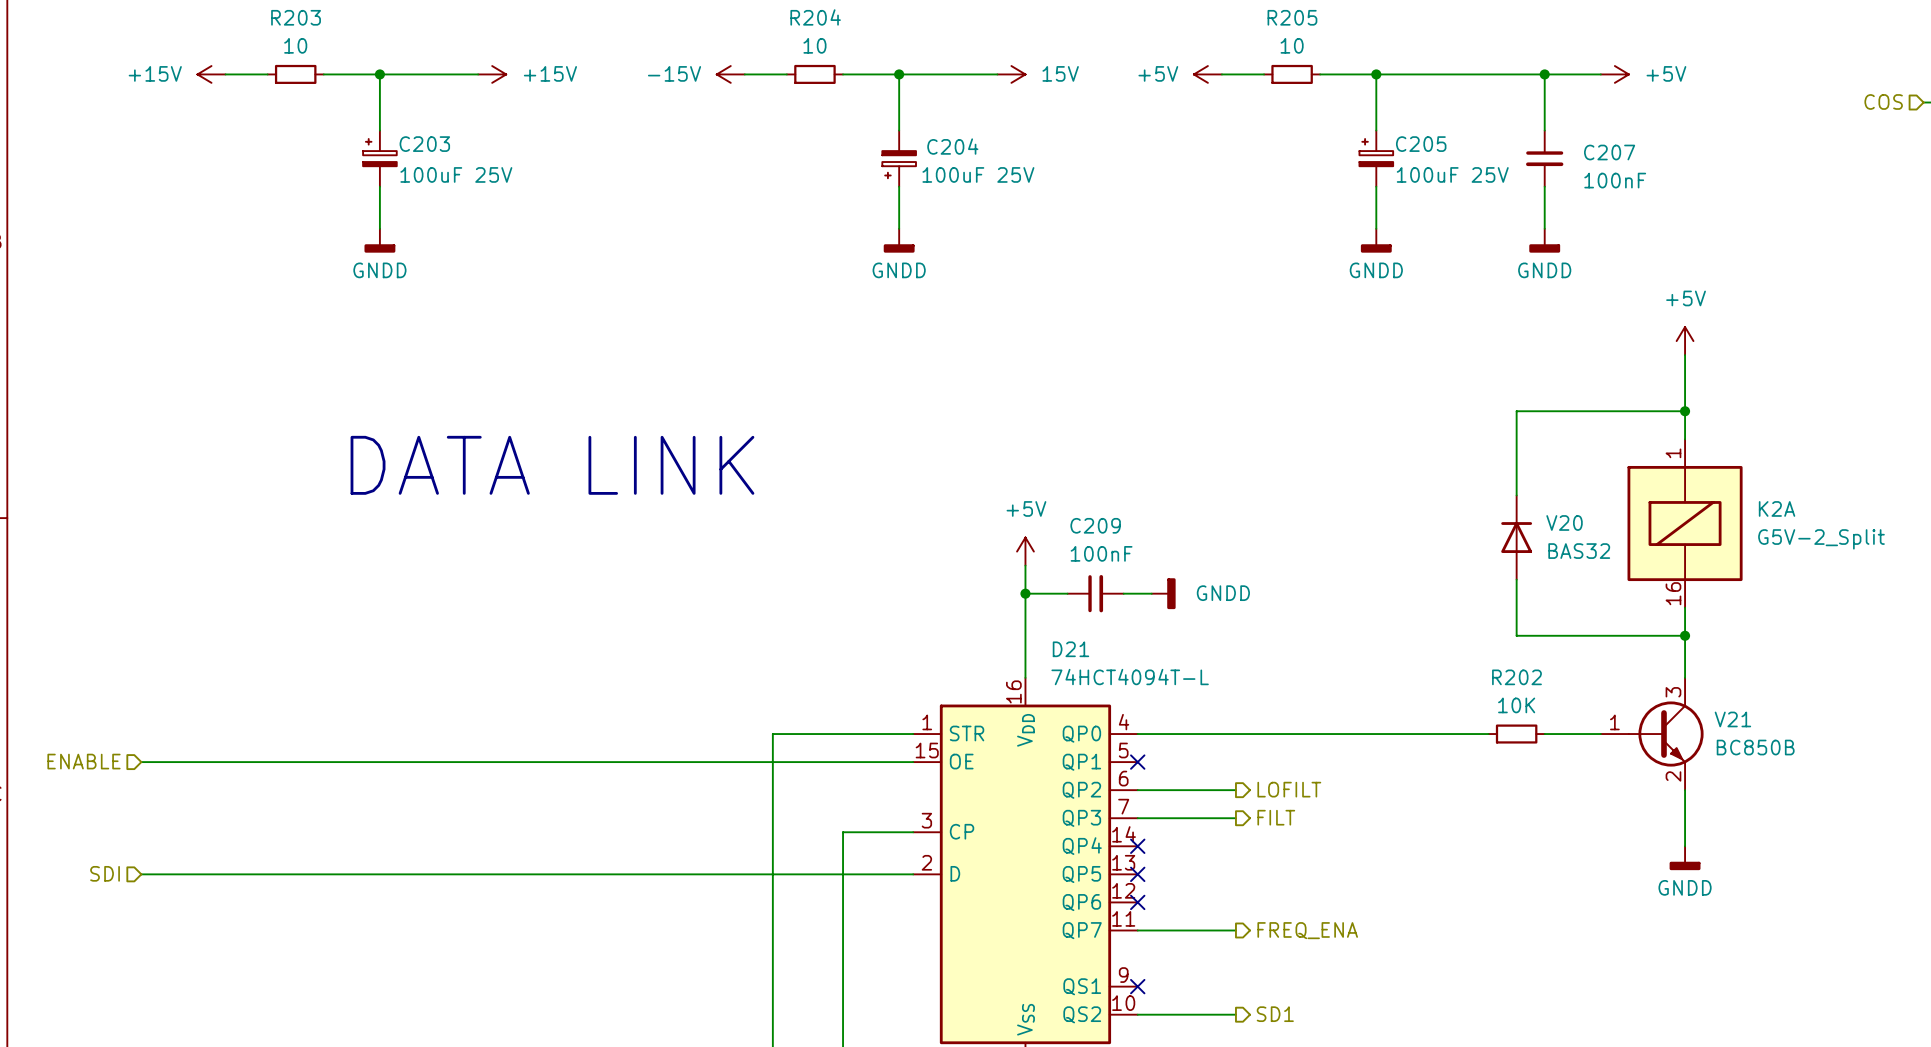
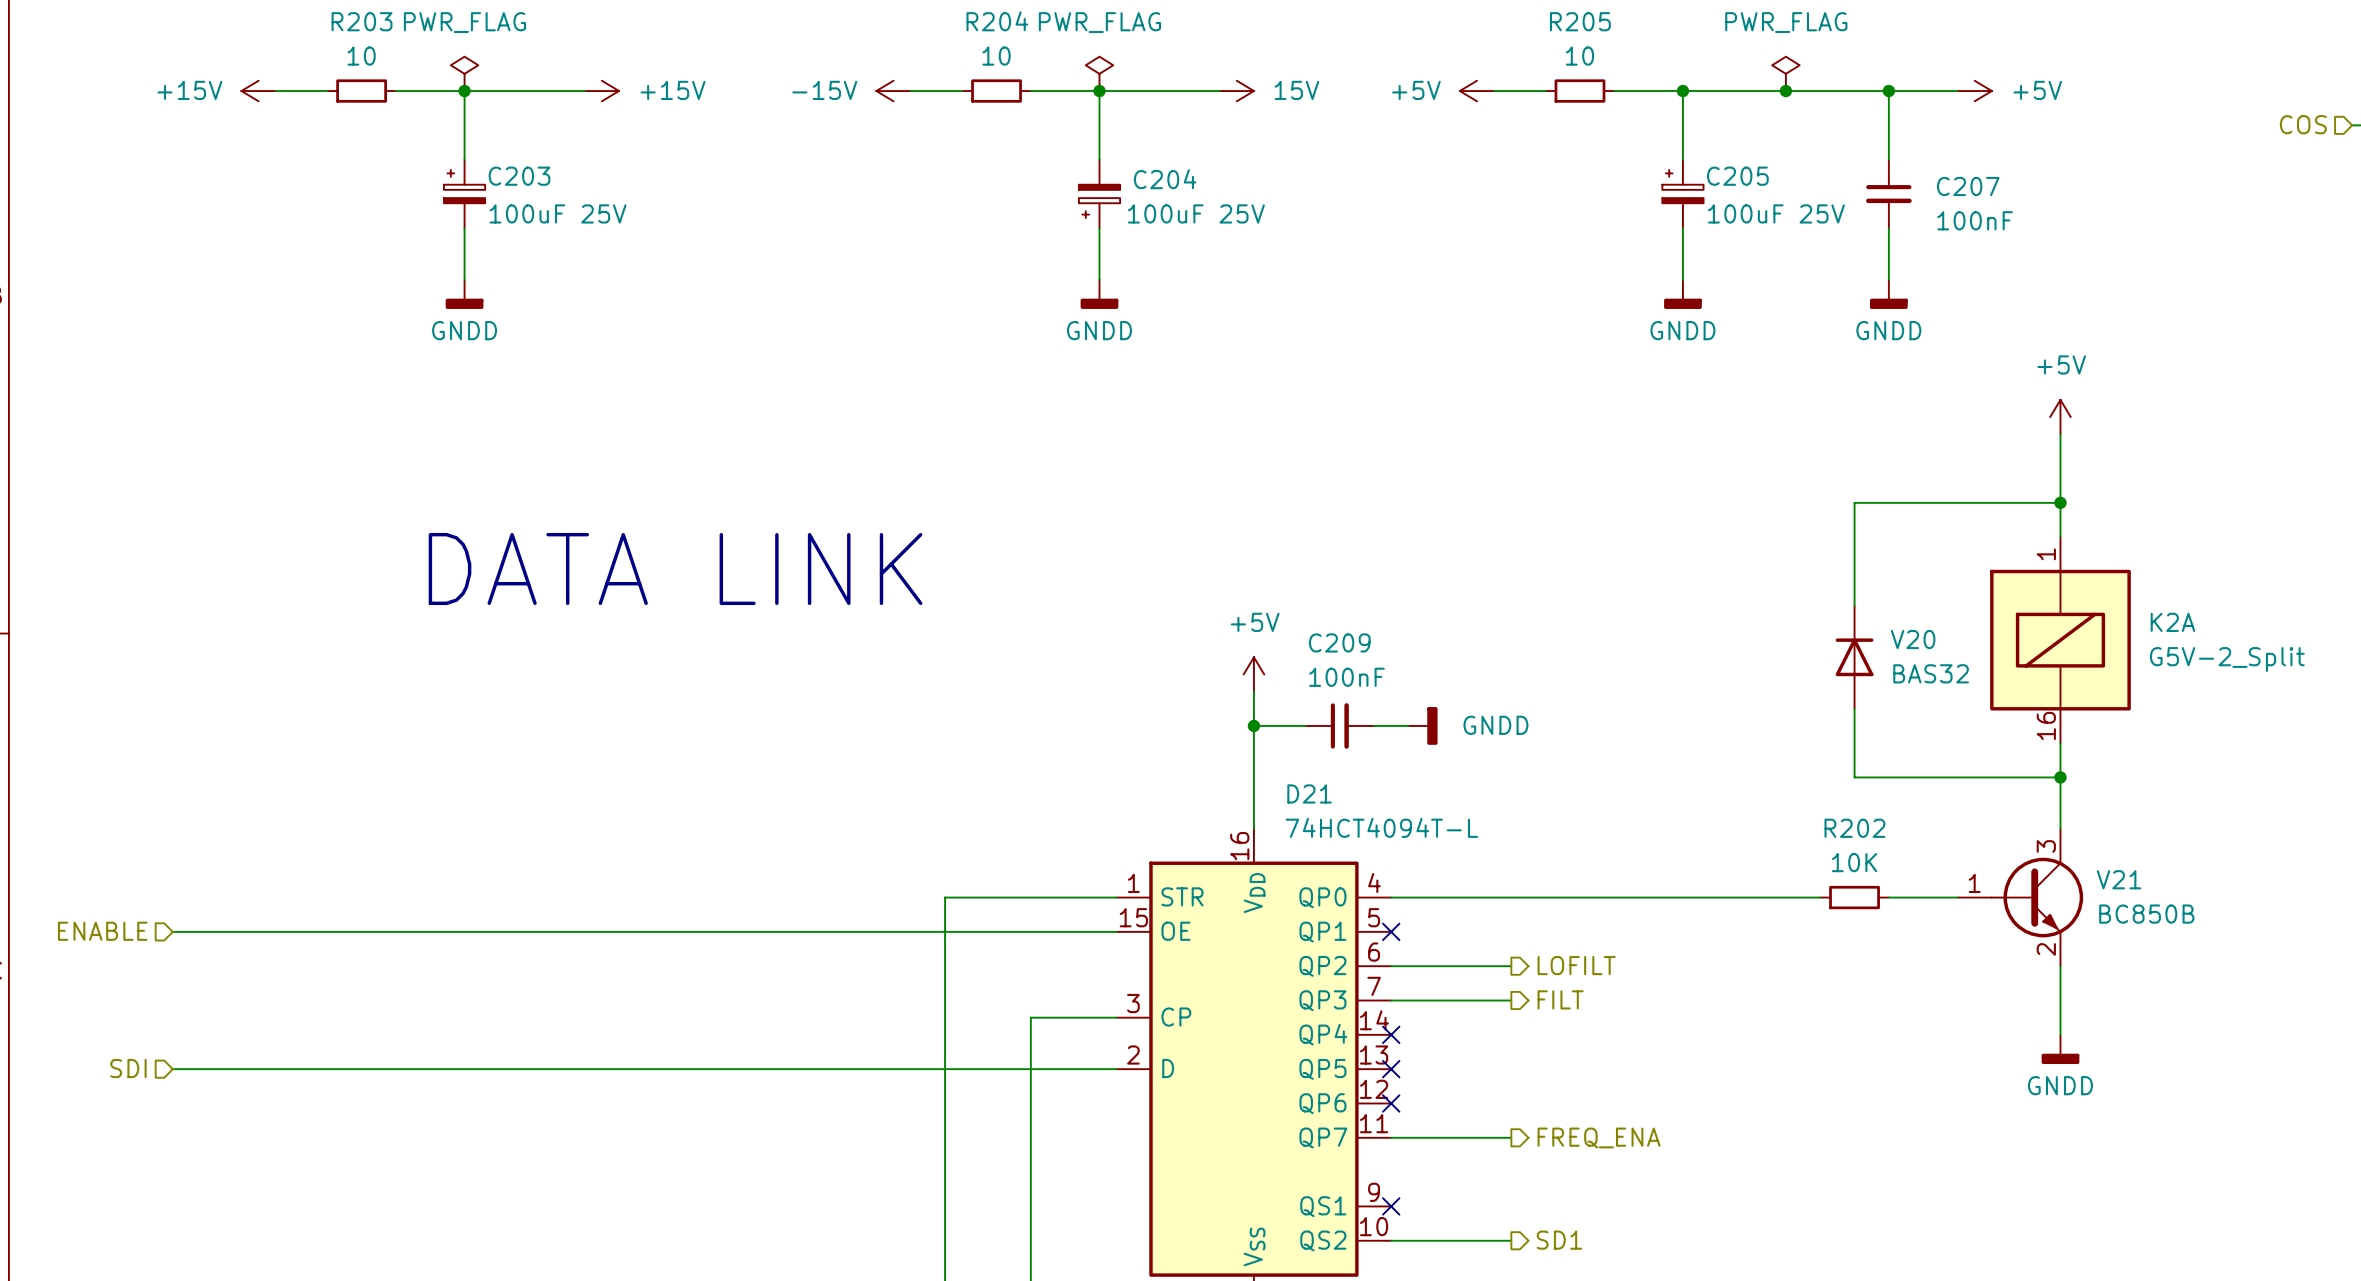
power symbol: none -> PWR_FLAG (464, 73)
power symbol: none -> PWR_FLAG (1099, 73)
power symbol: none -> PWR_FLAG (1785, 73)
junction: none -> (1785, 91)

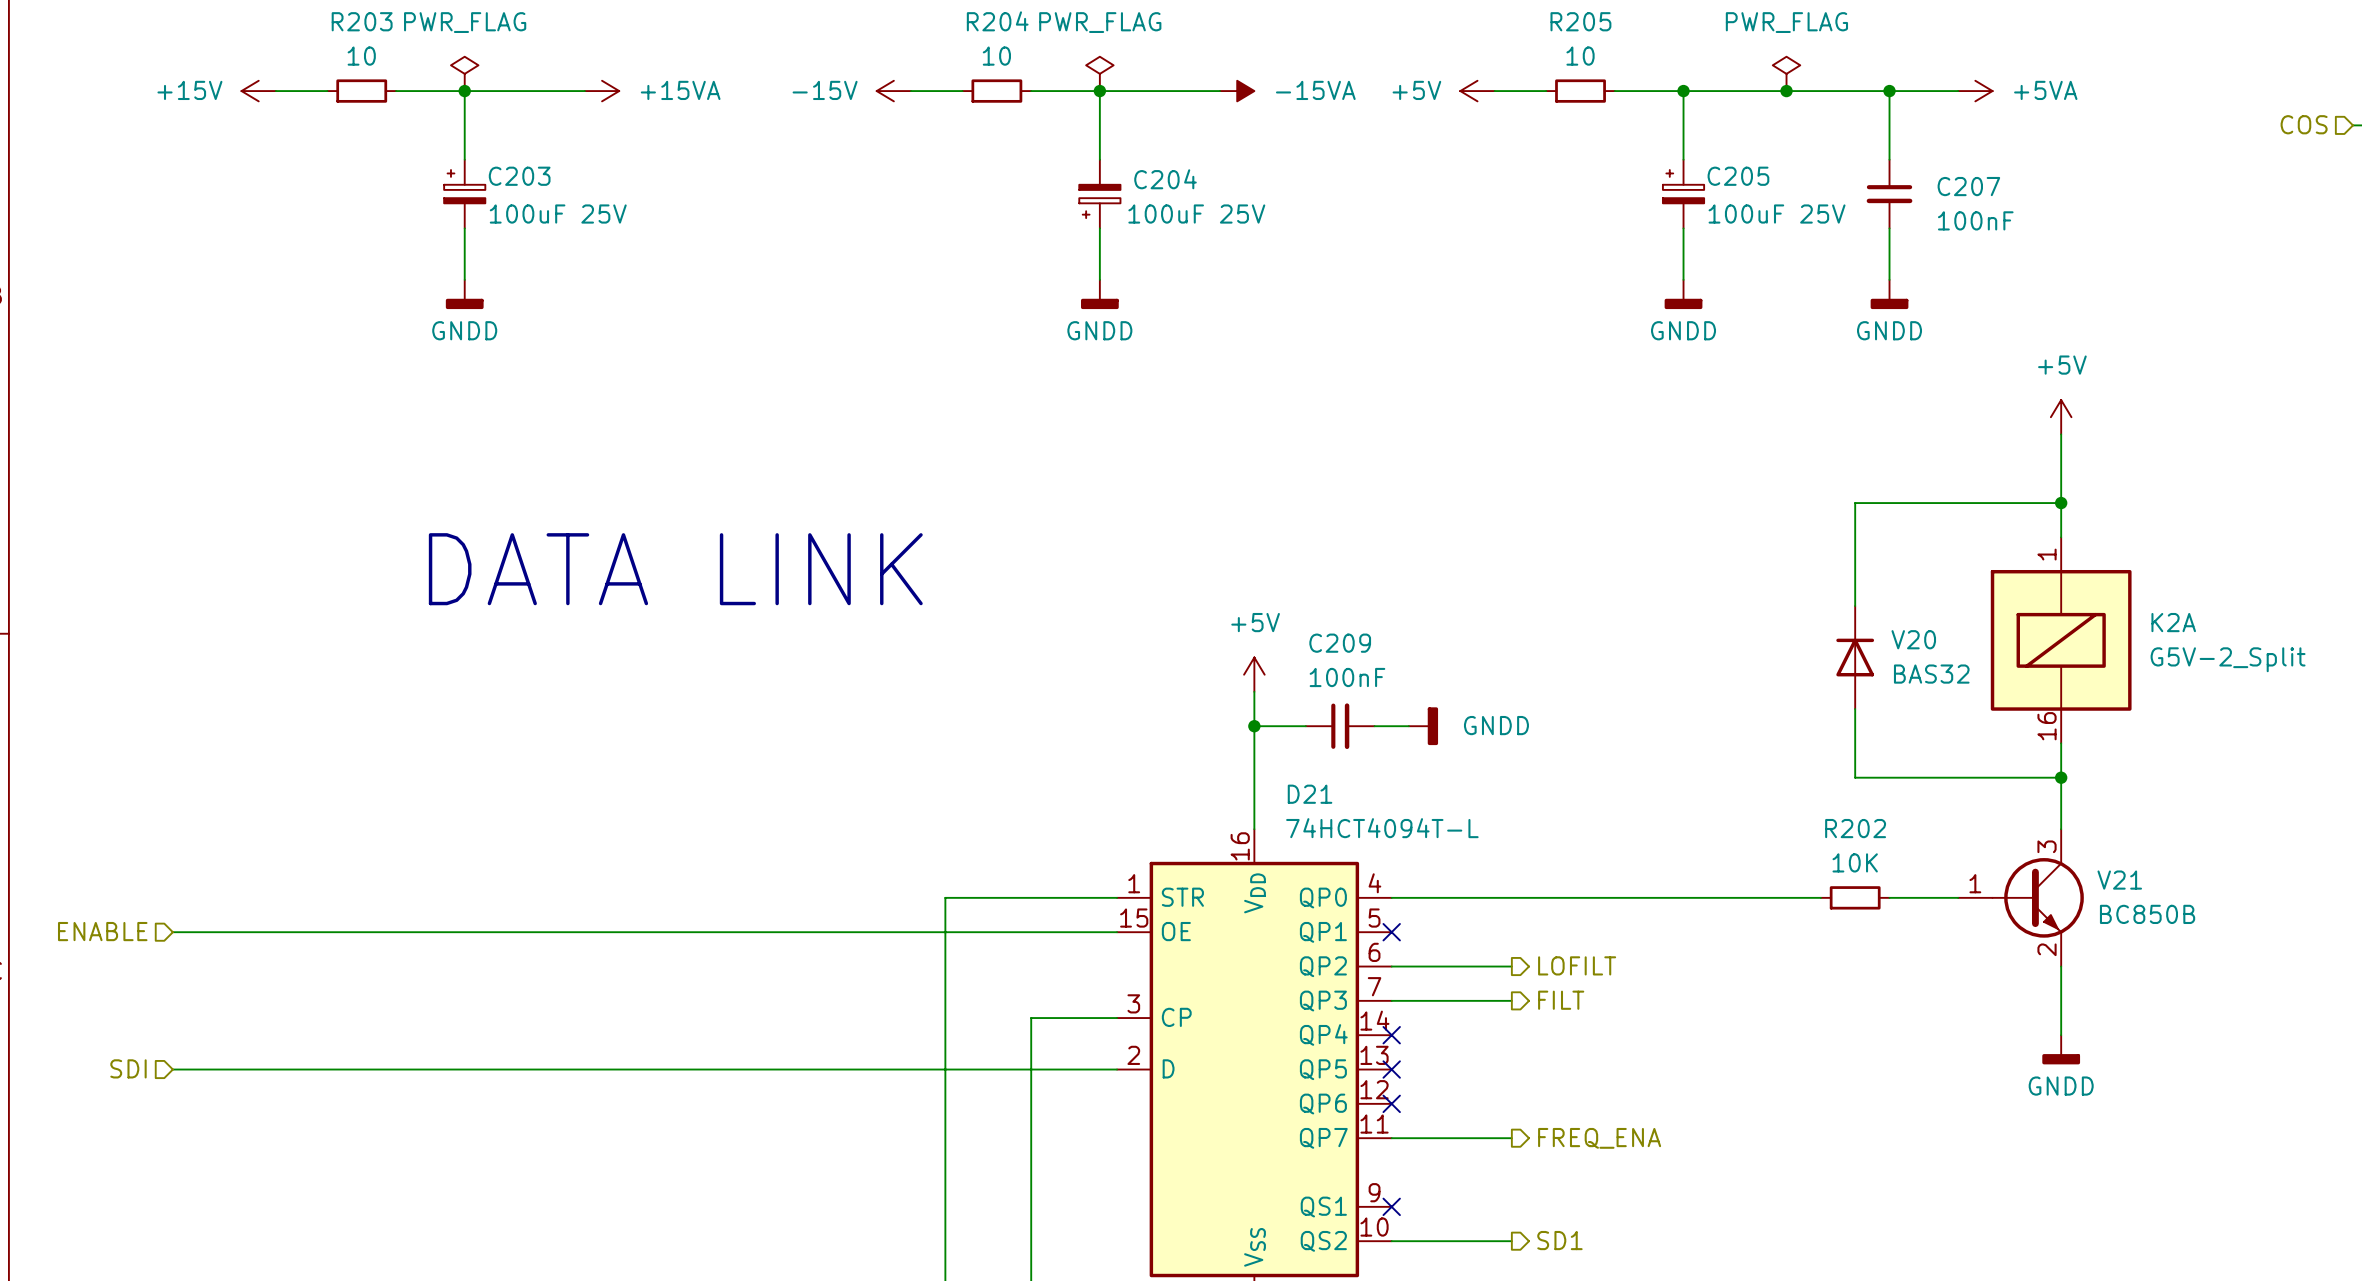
power symbol: +15V (601, 91) -> +15VA (602, 91)
power symbol: 15V (1236, 91) -> -15VA (1237, 91)
power symbol: +5V (1974, 91) -> +5VA (1975, 91)

